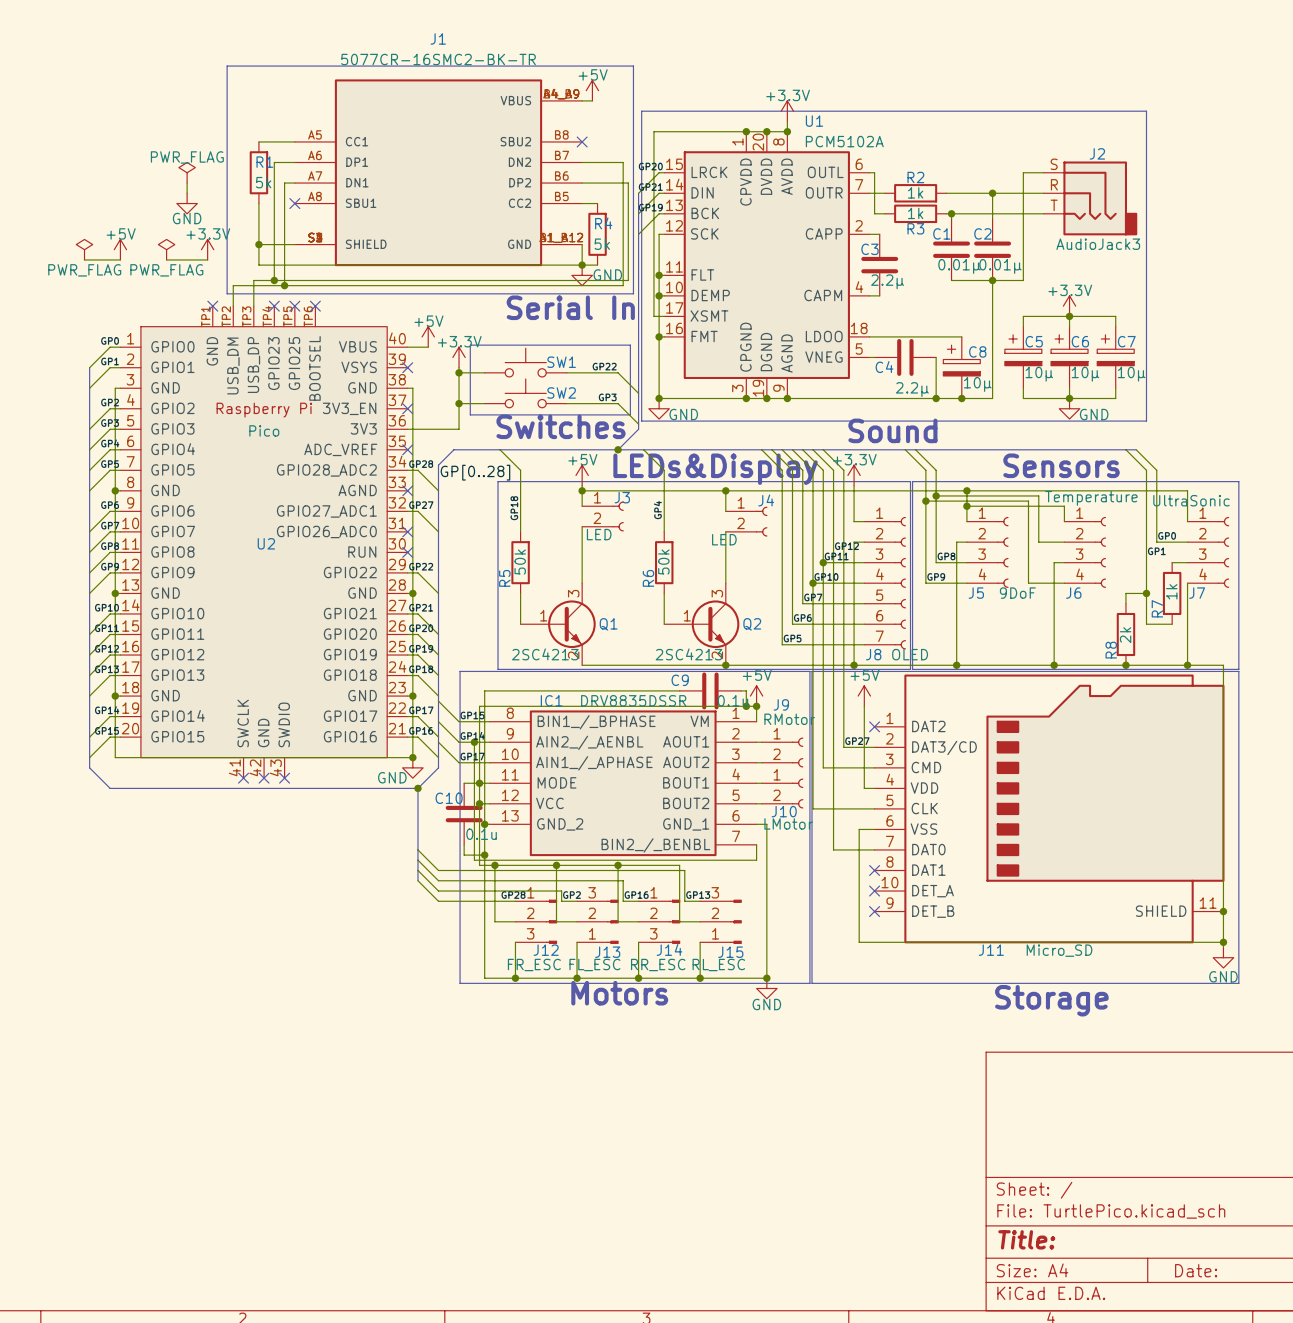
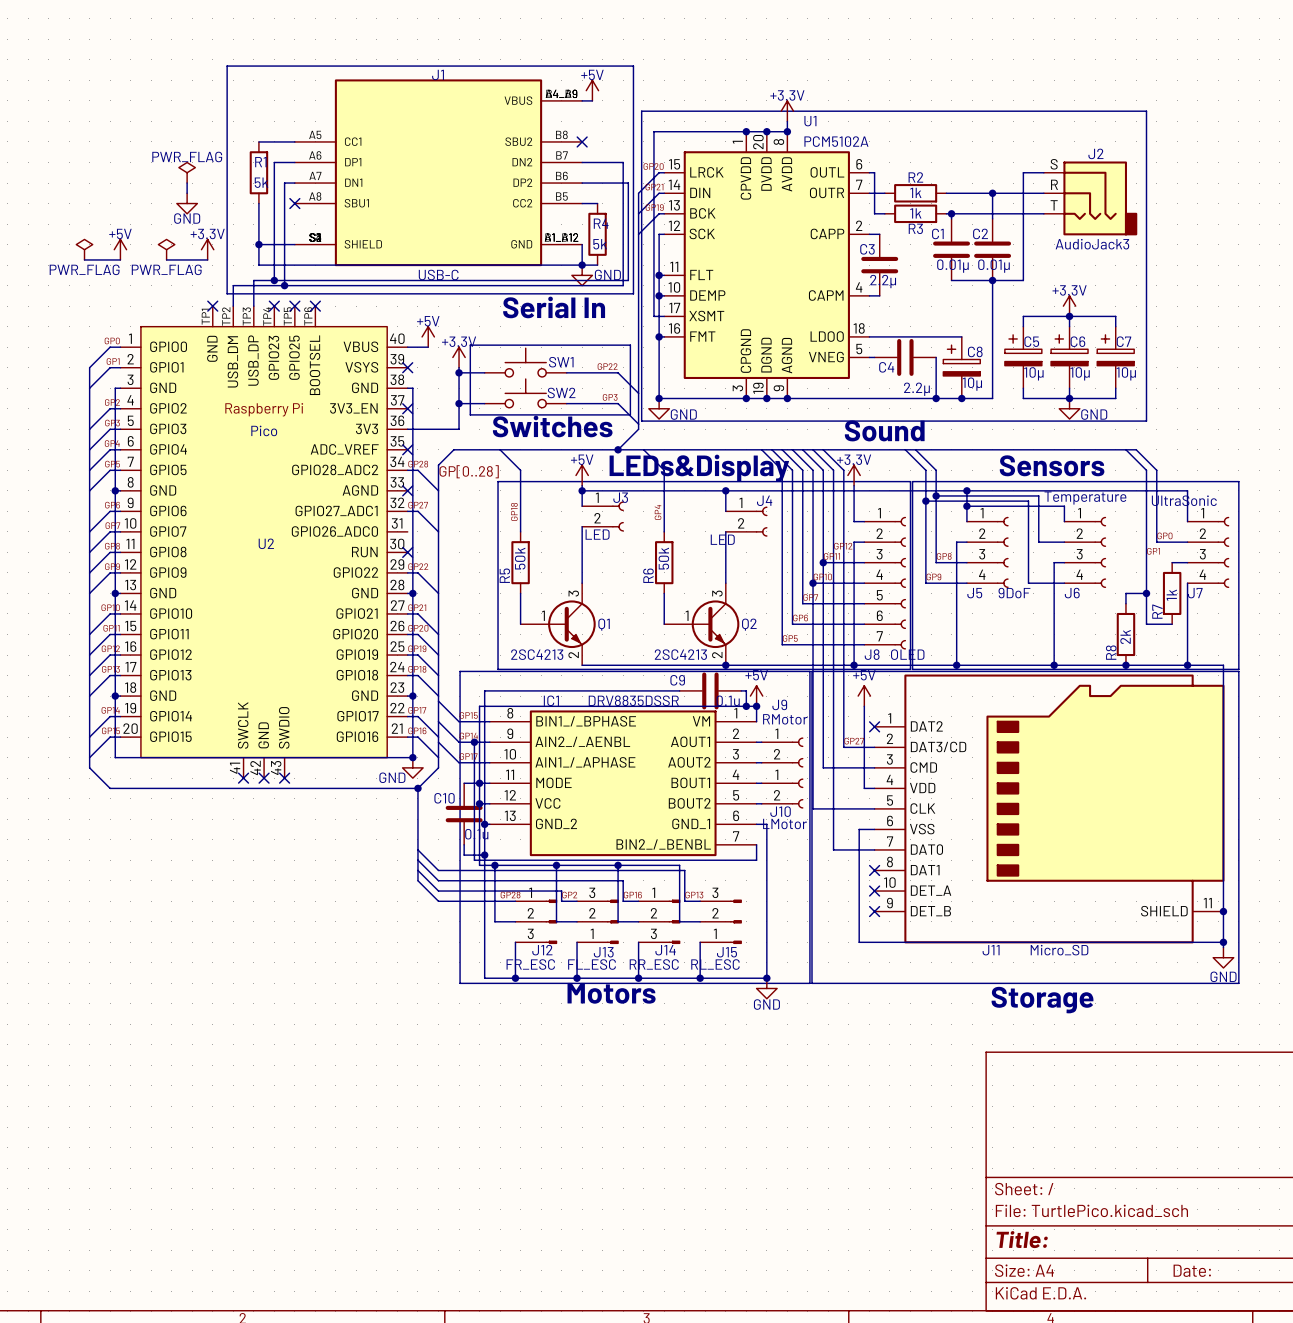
J1 name position: J1 (438, 38) -> J1 (438, 74)
J1 value: 5077CR-16SMC2-BK-TR (438, 59) -> USB-C (438, 274)
no-connect mark: (407, 531) -> none

